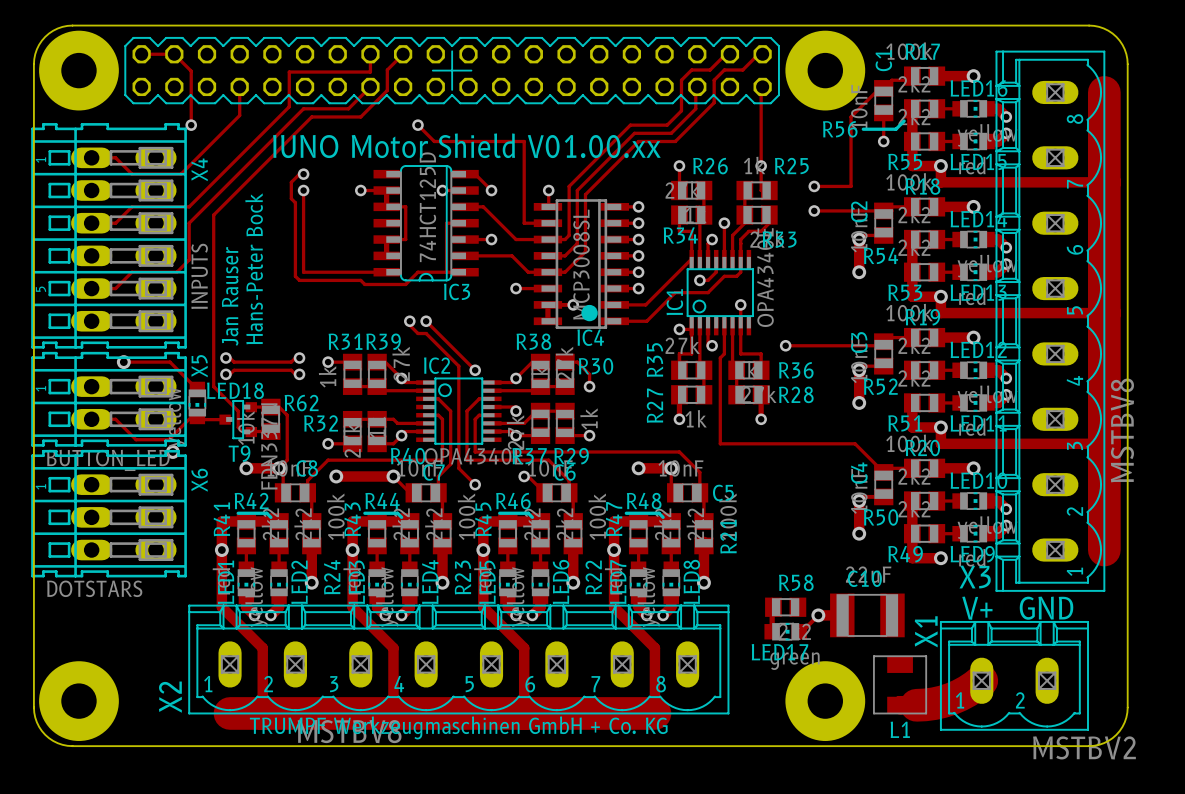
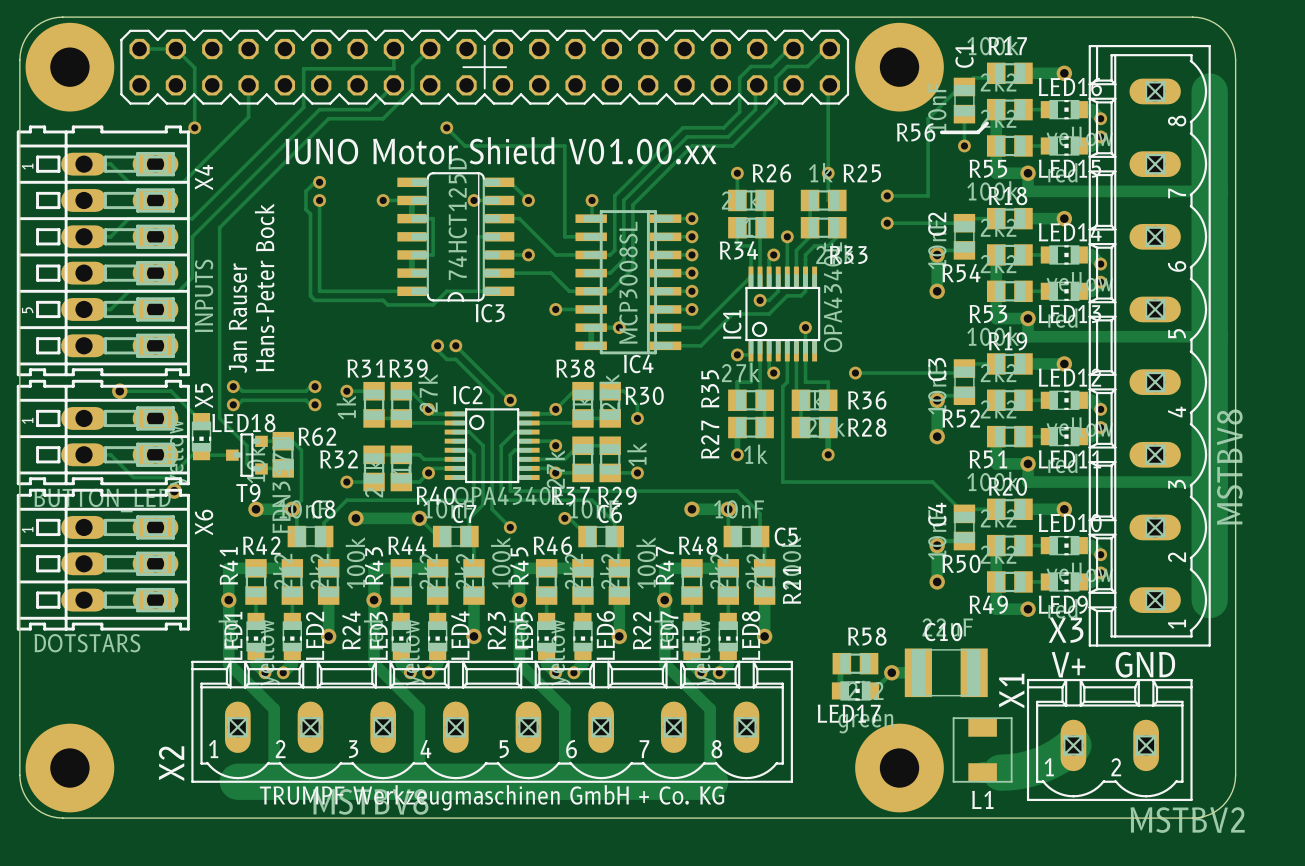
drawing: [581, 304, 598, 322] -> none
line: (238, 513) (266, 513) (270, 517) -> none
line: (364, 513) (397, 513) (401, 517) -> none
line: (499, 513) (528, 513) (532, 517) -> none
line: (626, 513) (659, 513) (663, 517) -> none

